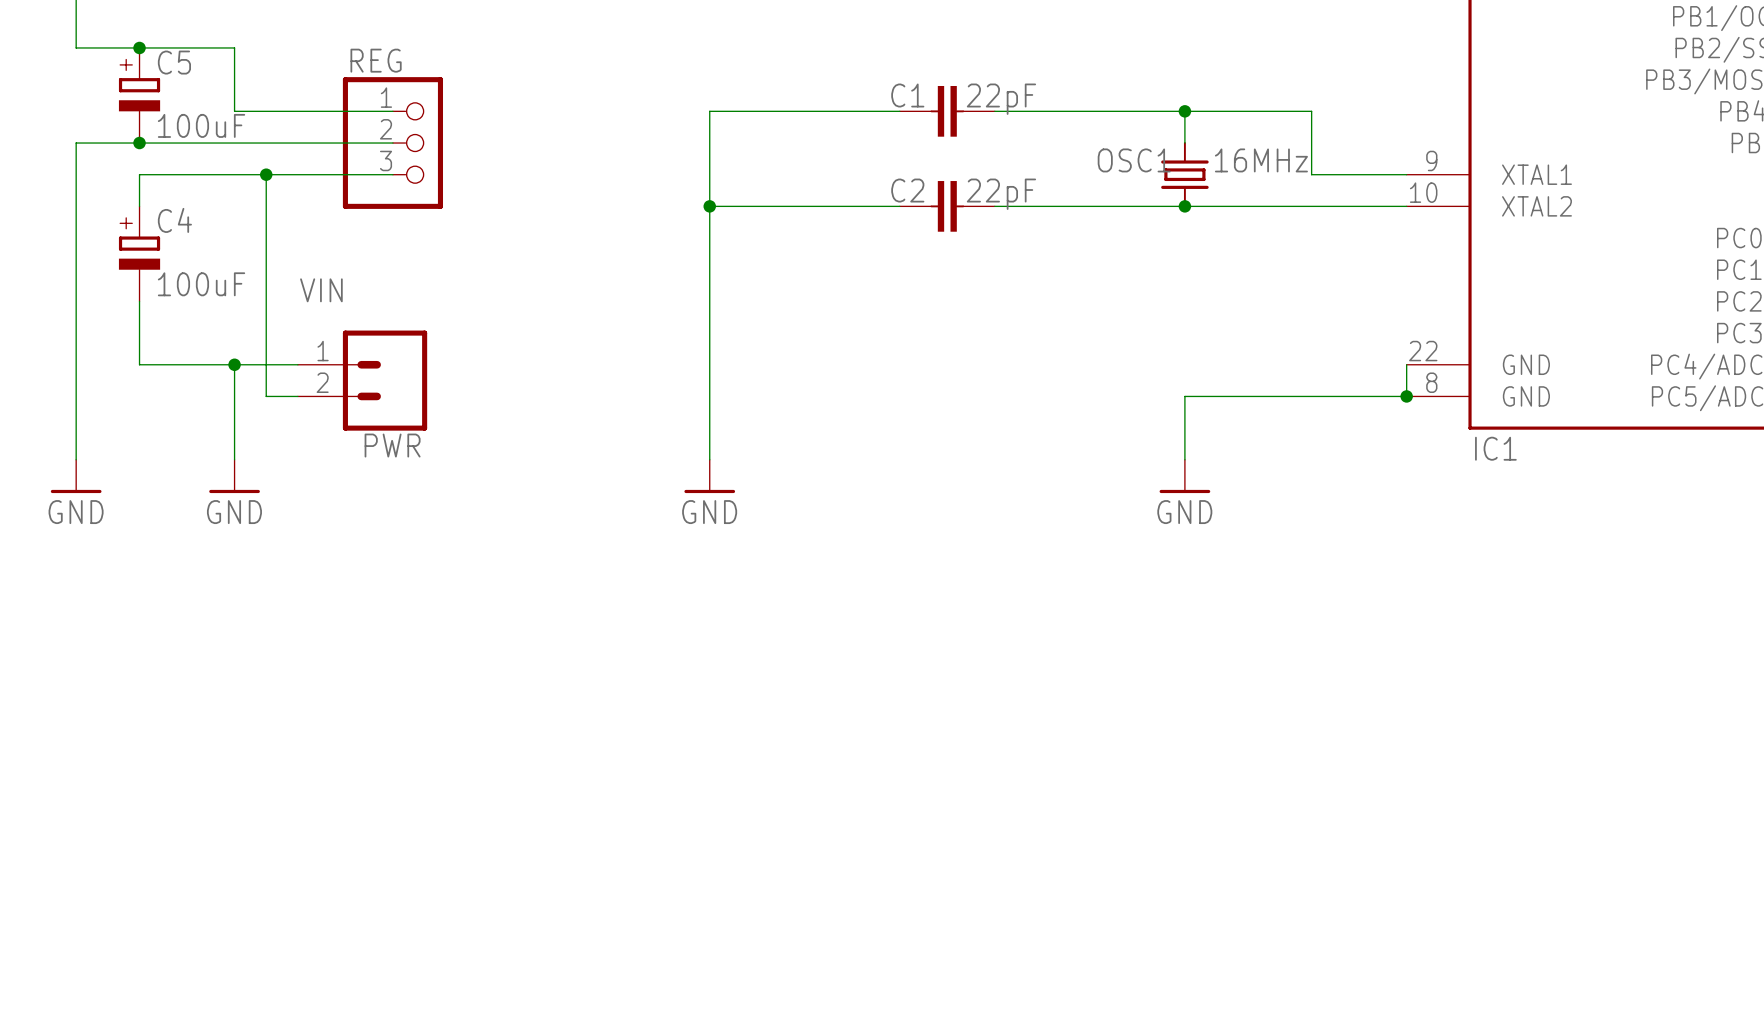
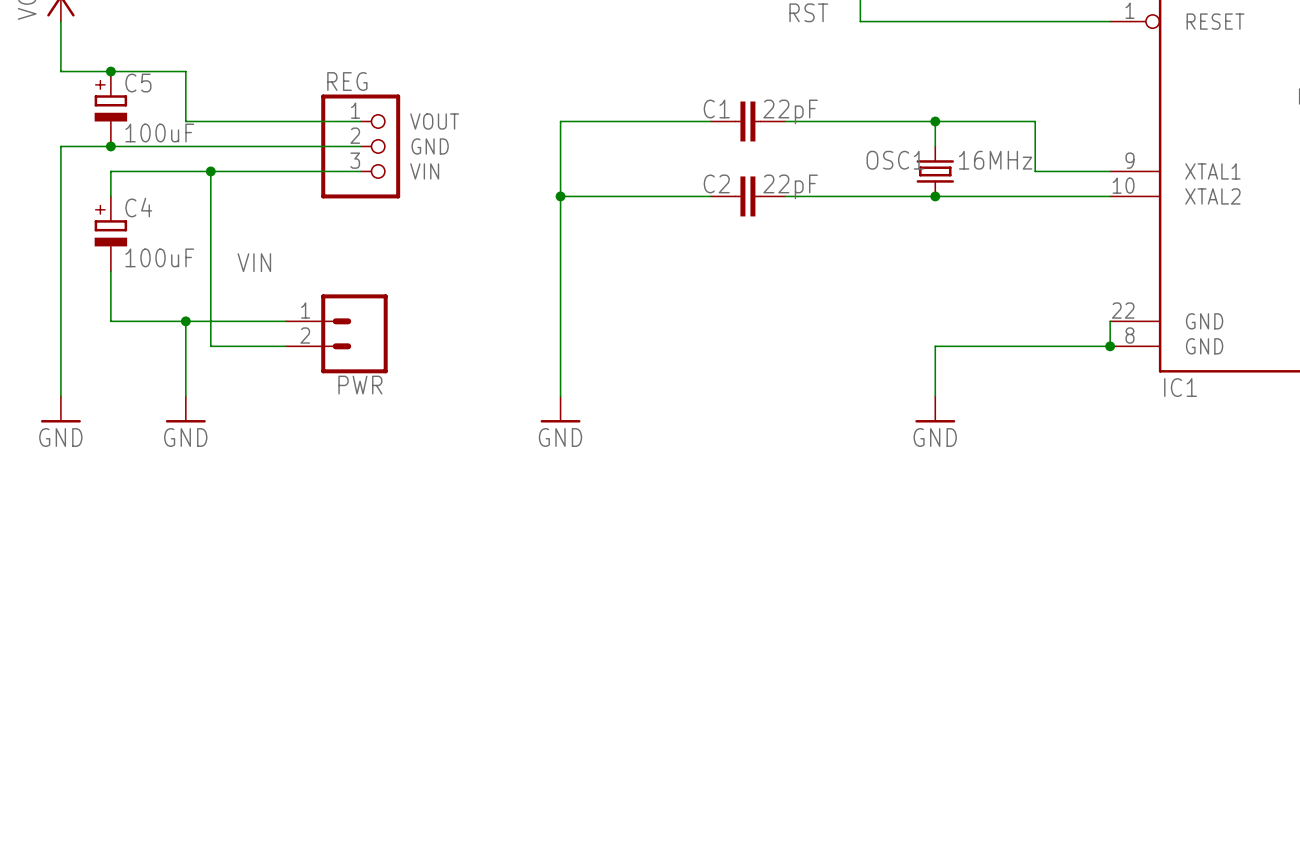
wire: none -> (310, 121) (360, 121)
wire: none -> (310, 146) (360, 146)
REG: (392, 143) -> none
REG: none -> (360, 146)
wire: none -> (310, 171) (360, 171)
PWR position: (362, 380) -> (336, 333)

